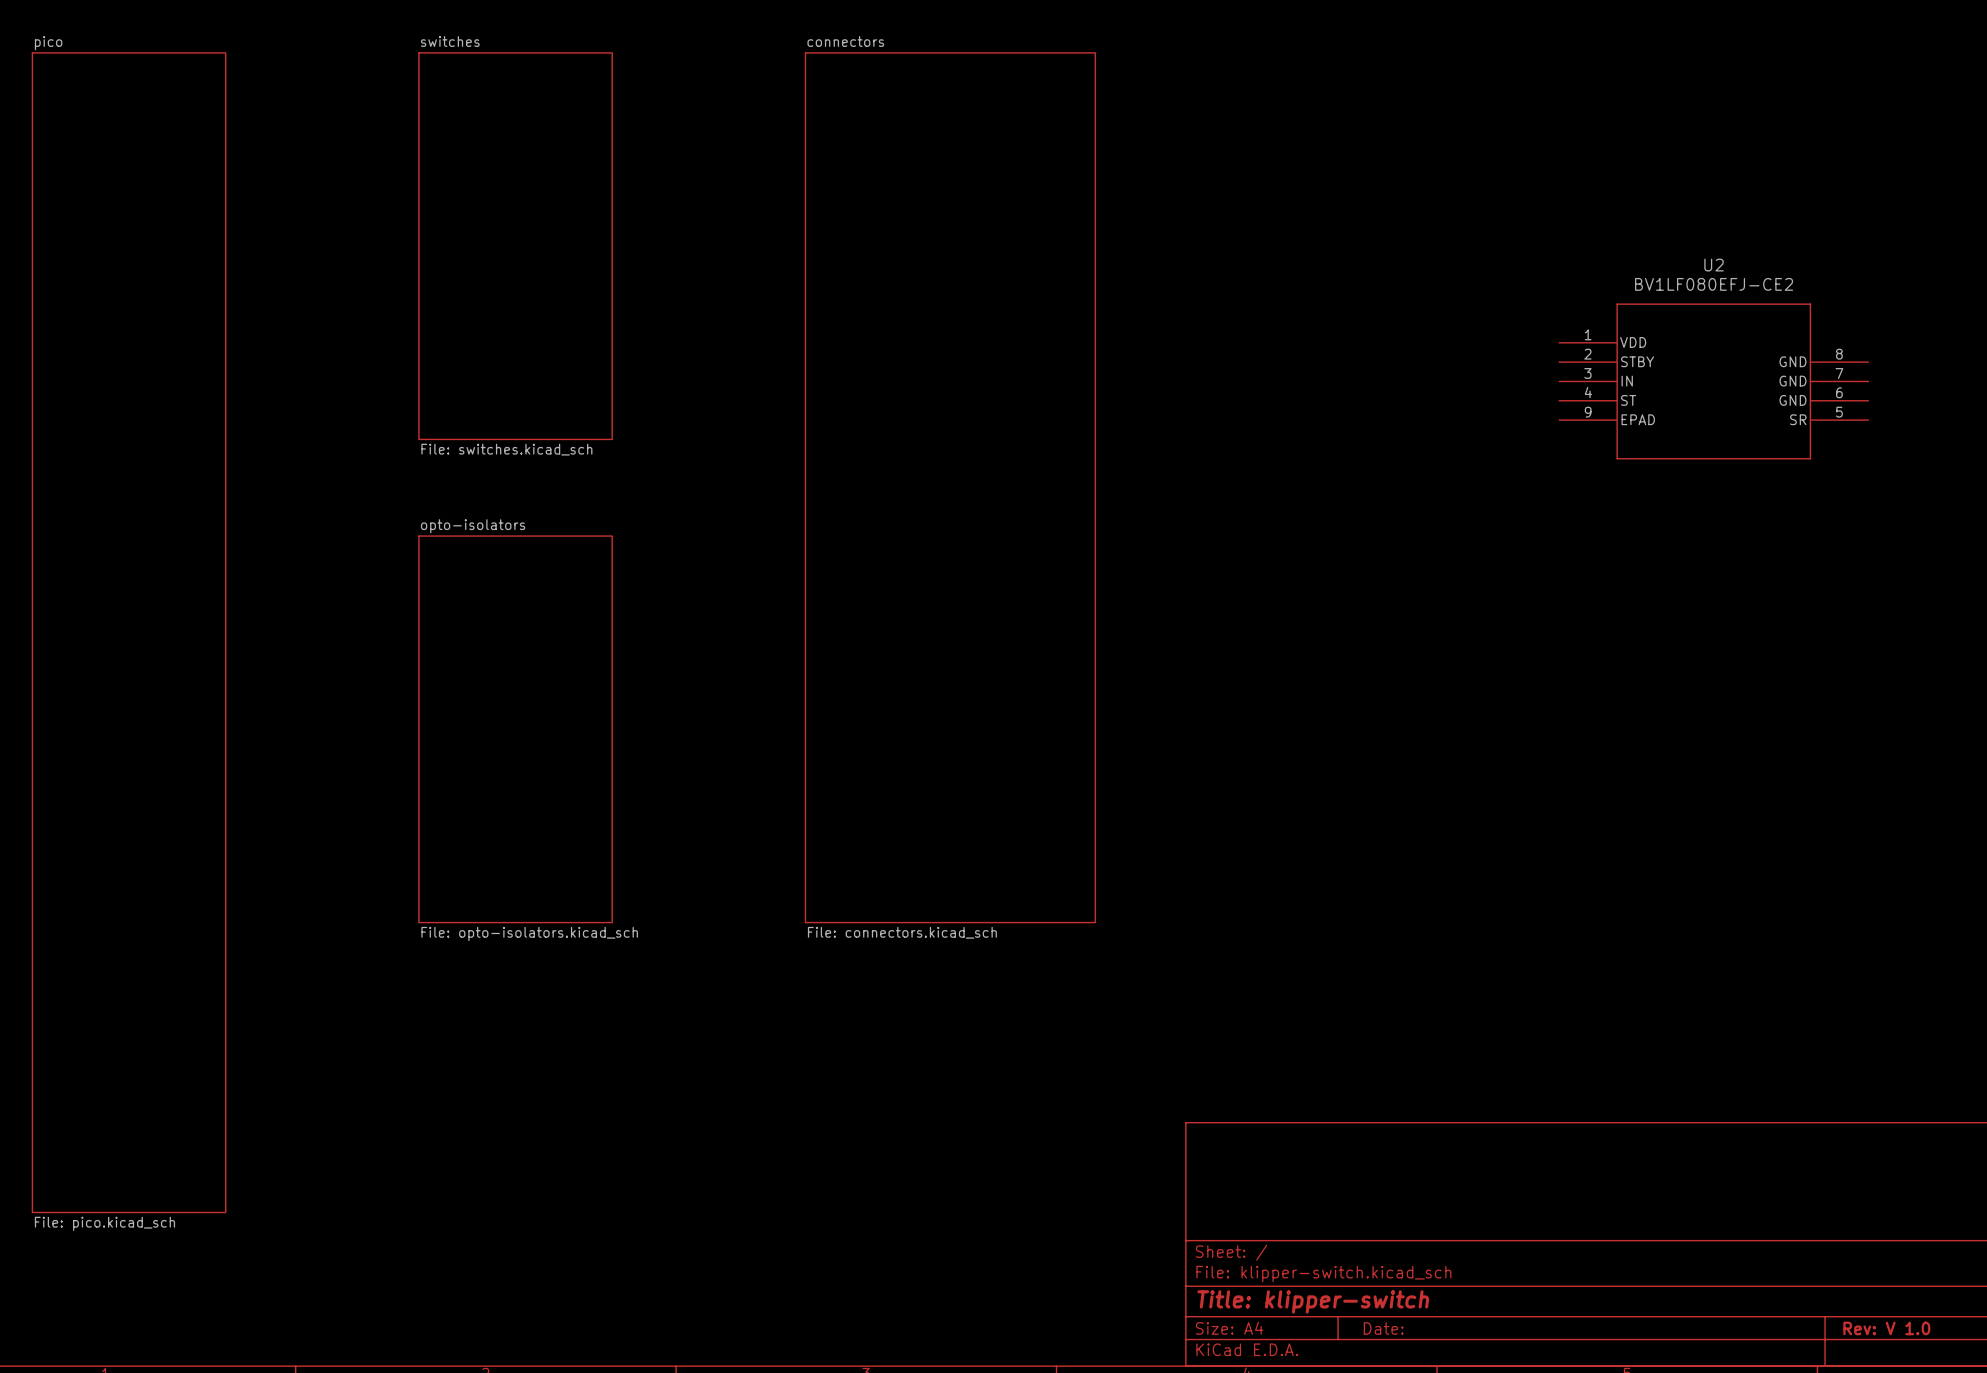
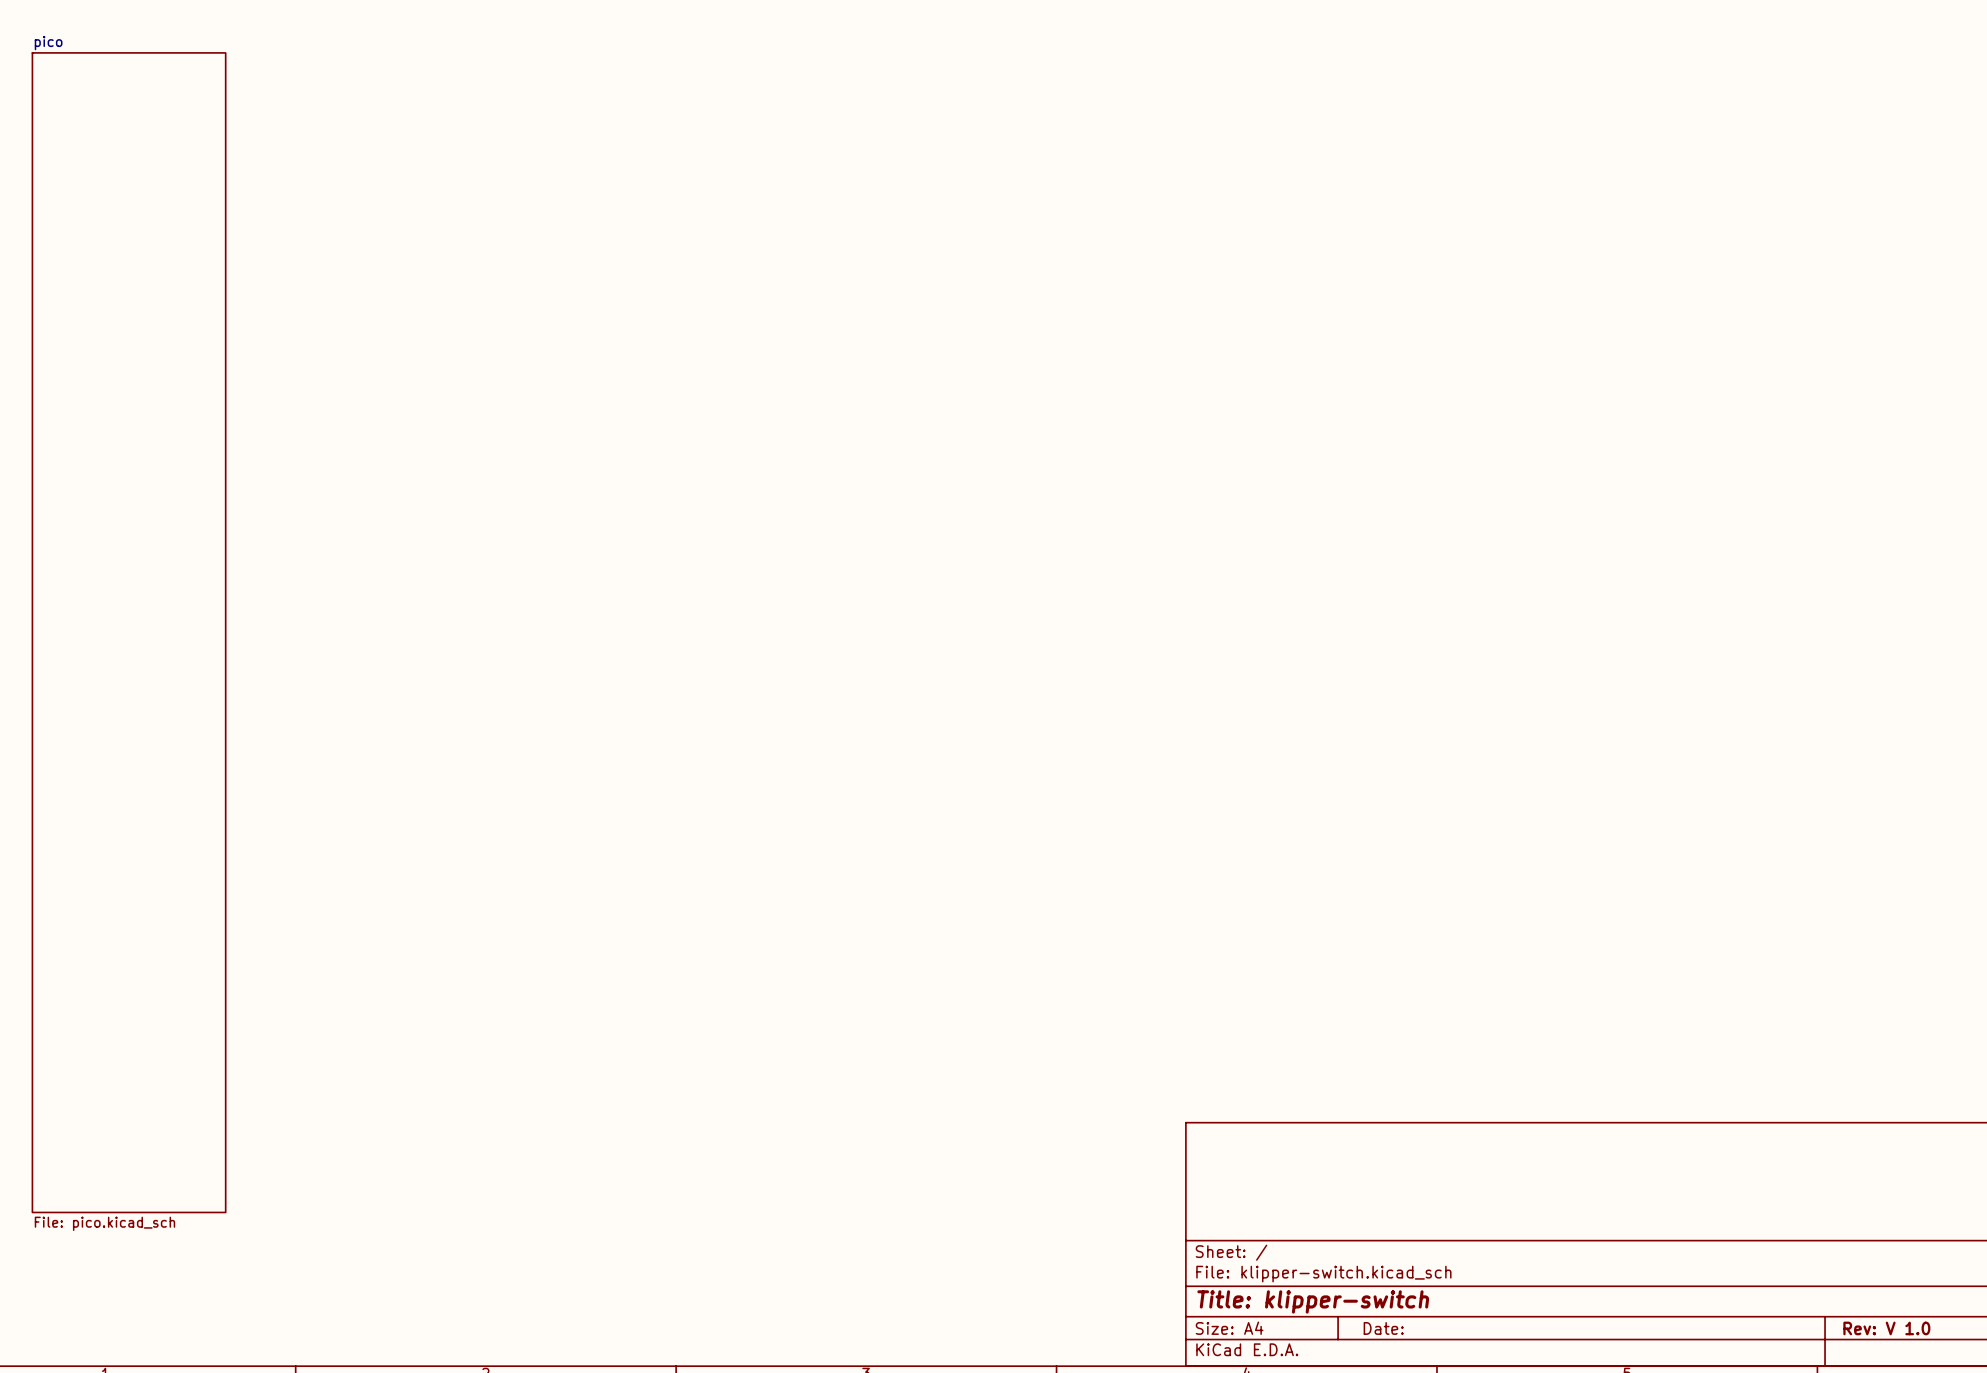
sheet switches: File: switches.kicad_sch (515, 246) -> none
U2: BV1LF080EFJ-CE2 (1713, 381) -> none
sheet connectors: File: connectors.kicad_sch (950, 487) -> none
sheet opto-isolators: File: opto-isolators.kicad_sch (515, 729) -> none

